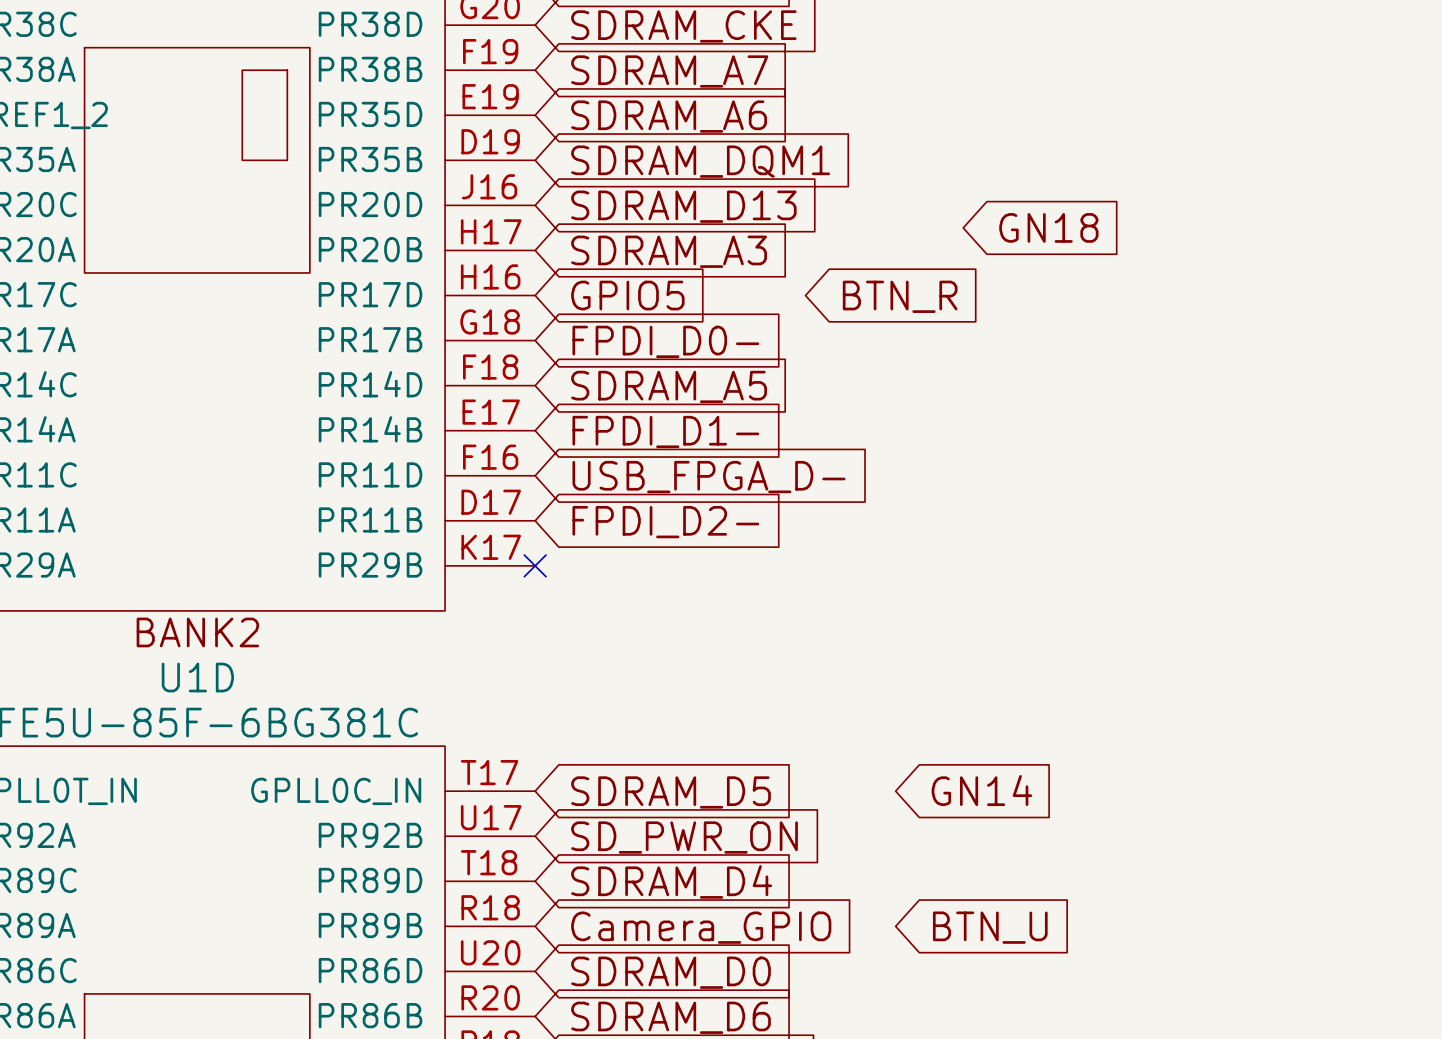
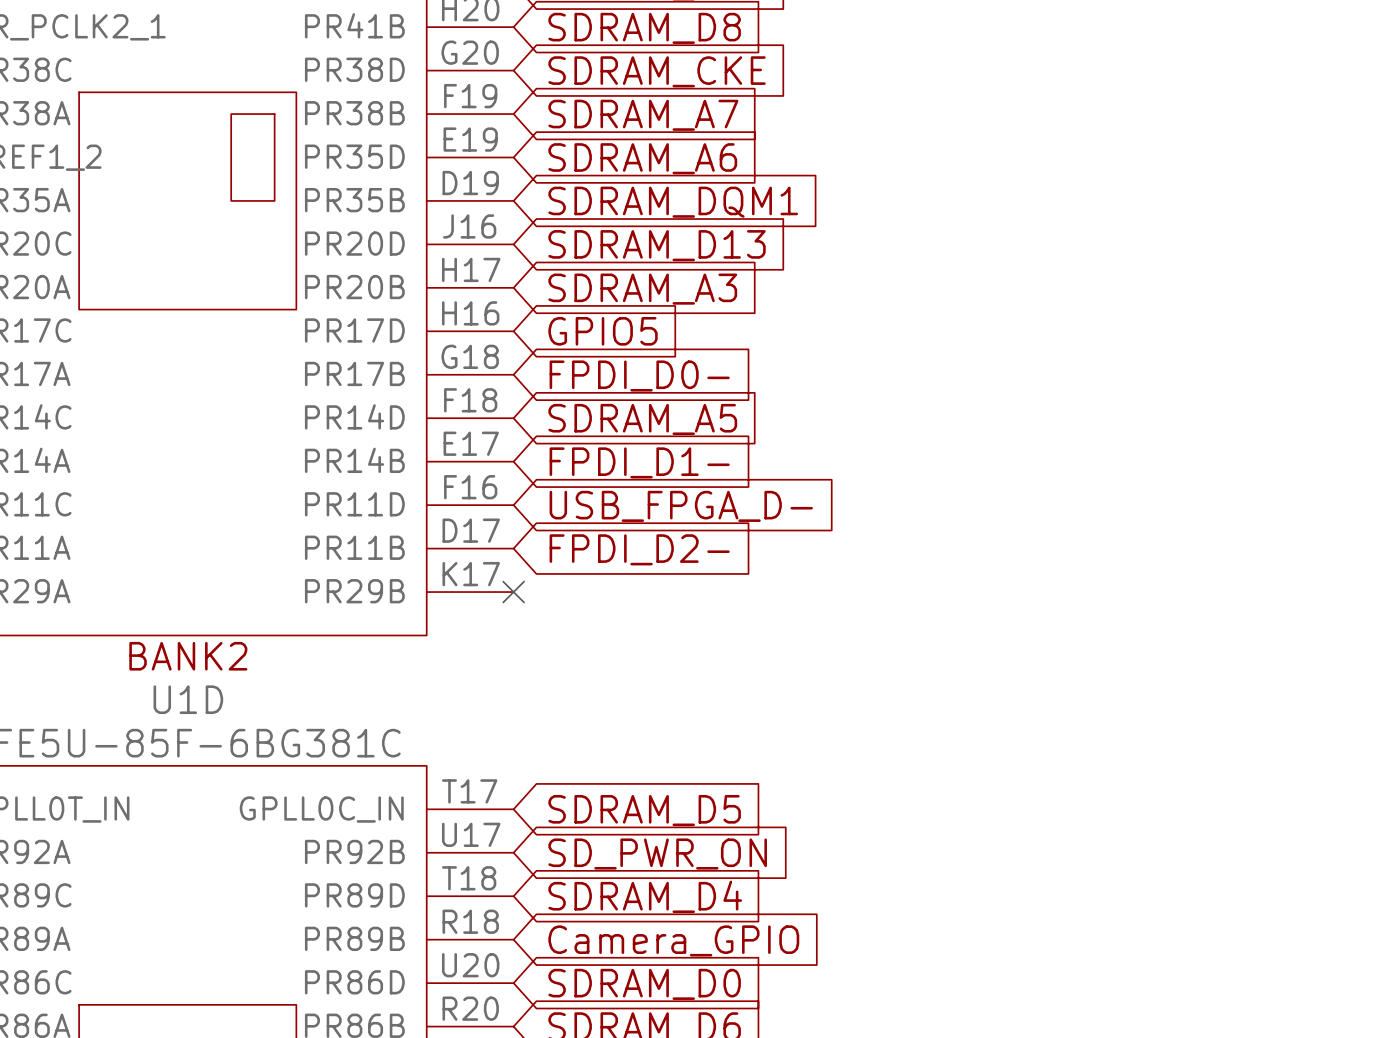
global label: GN18 (1048, 227) -> none
global label: BTN_R (900, 296) -> none
global label: GN14 (981, 790) -> none
global label: BTN_U (990, 927) -> none

